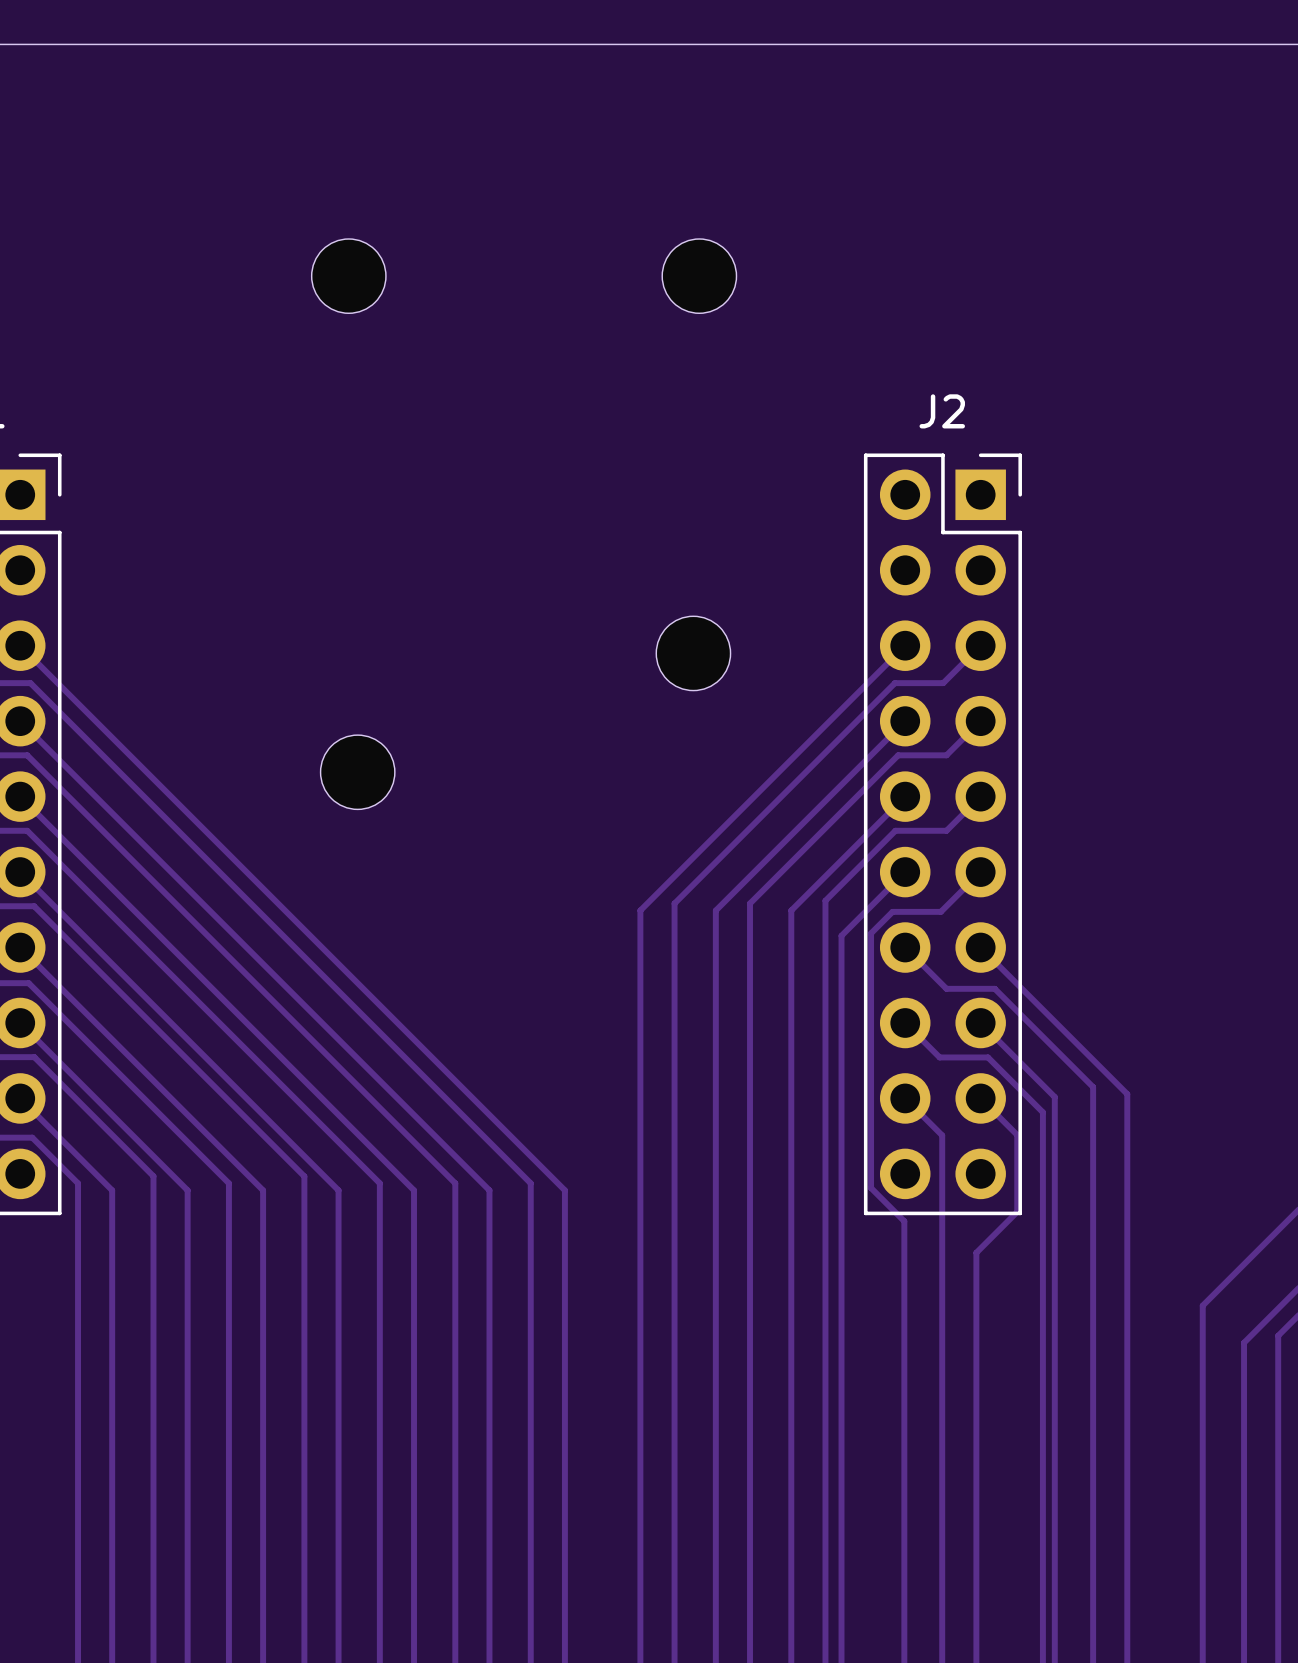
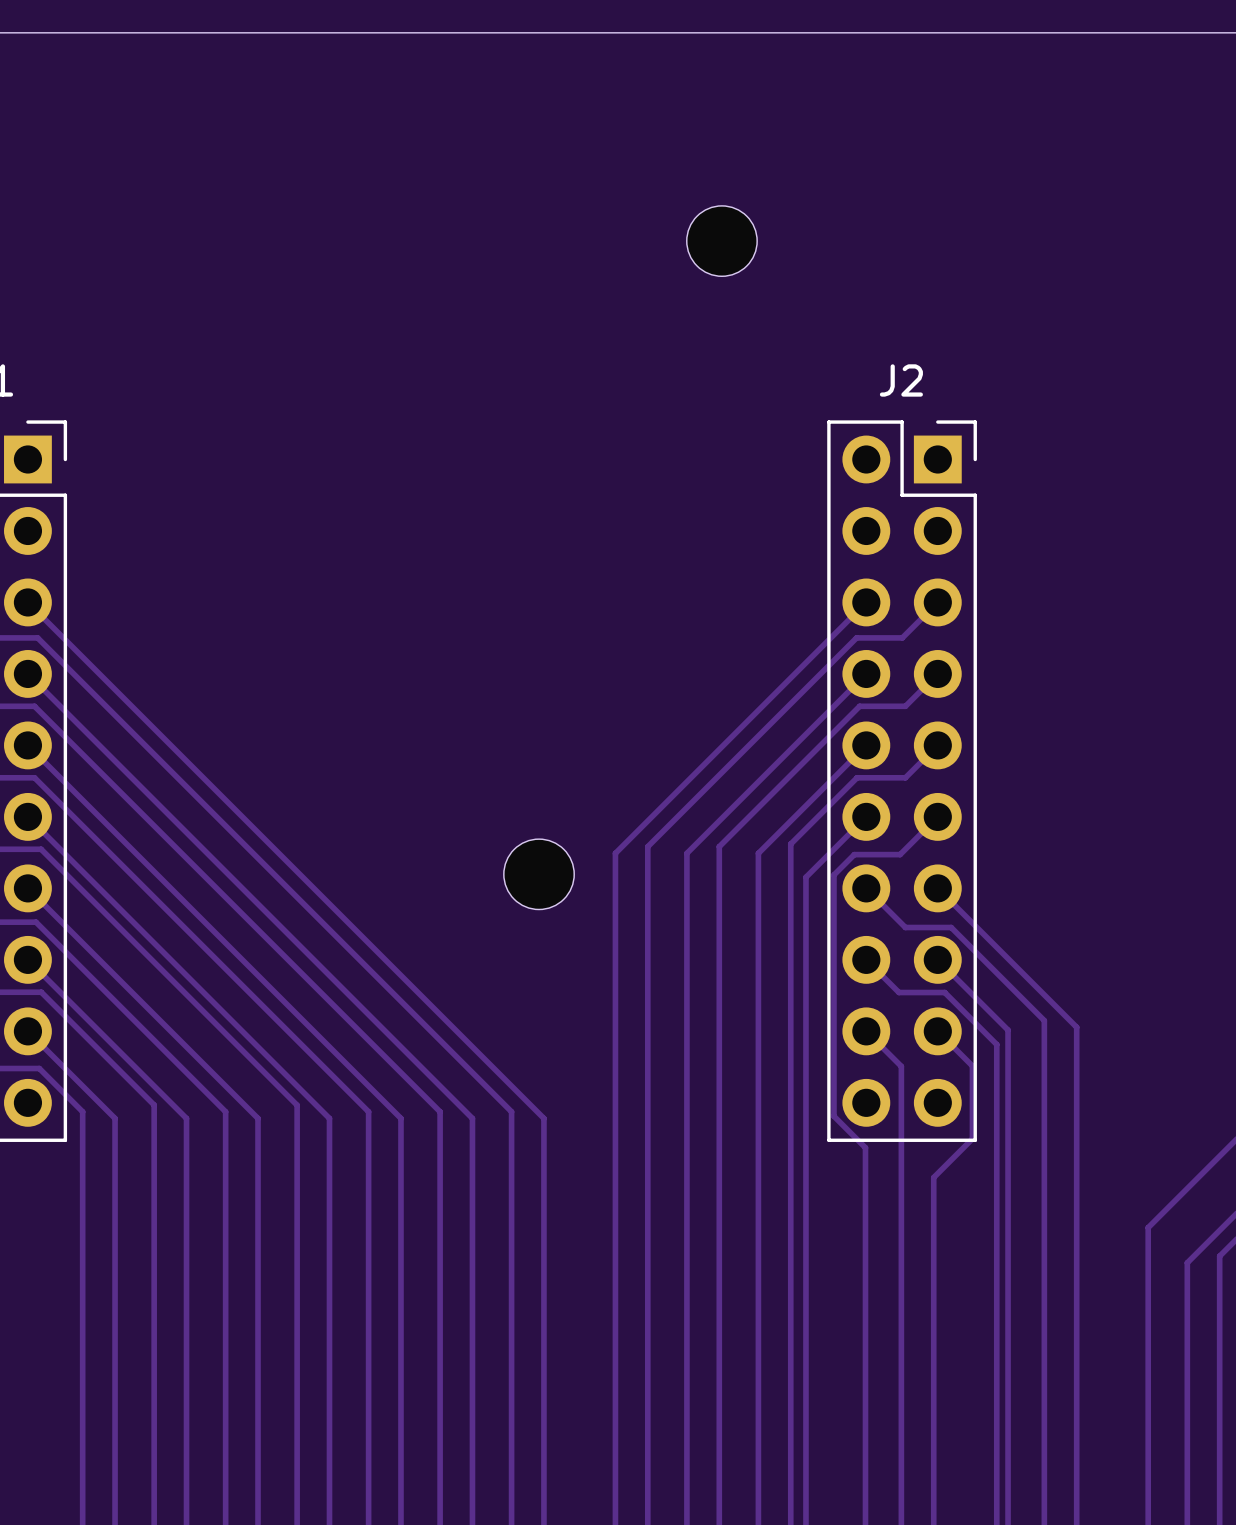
part: (348, 276) -> none
part position: (699, 276) -> (721, 241)
part: (693, 653) -> none
part: (357, 772) -> none
part: none -> (539, 874)

